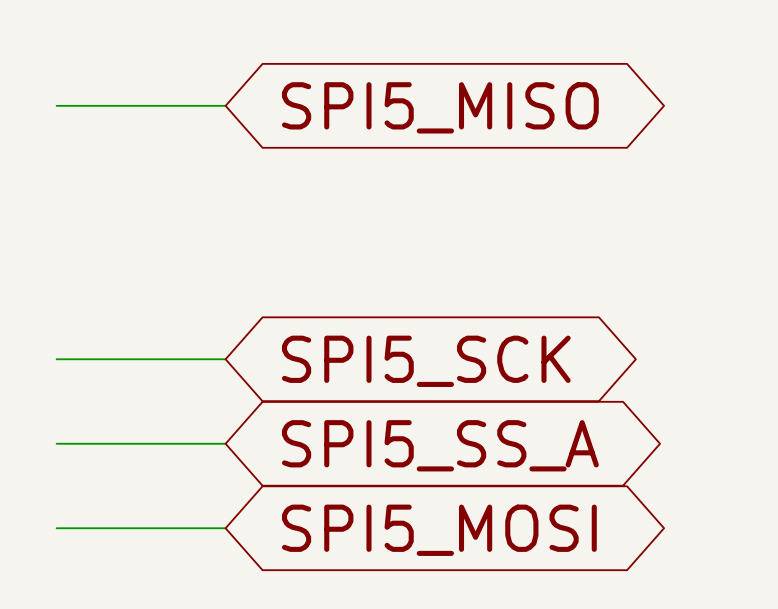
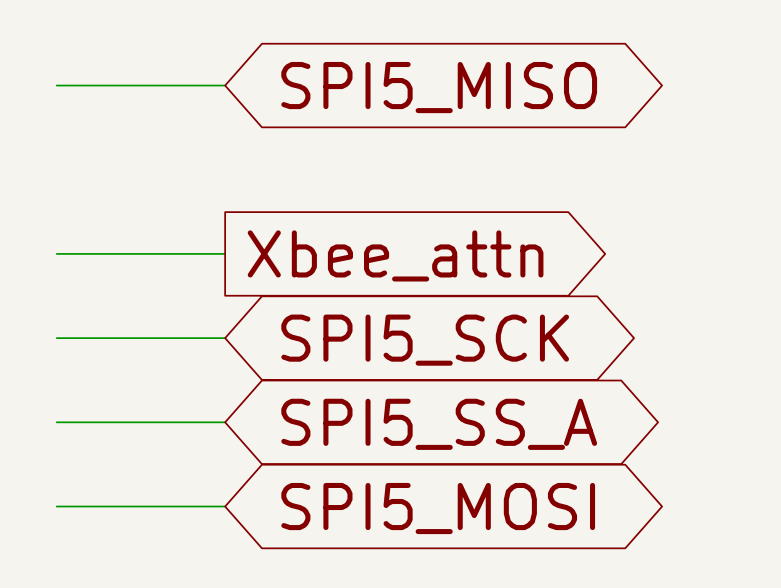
wire: none -> (56, 253) (225, 253)
global label: none -> Xbee_attn (395, 255)

